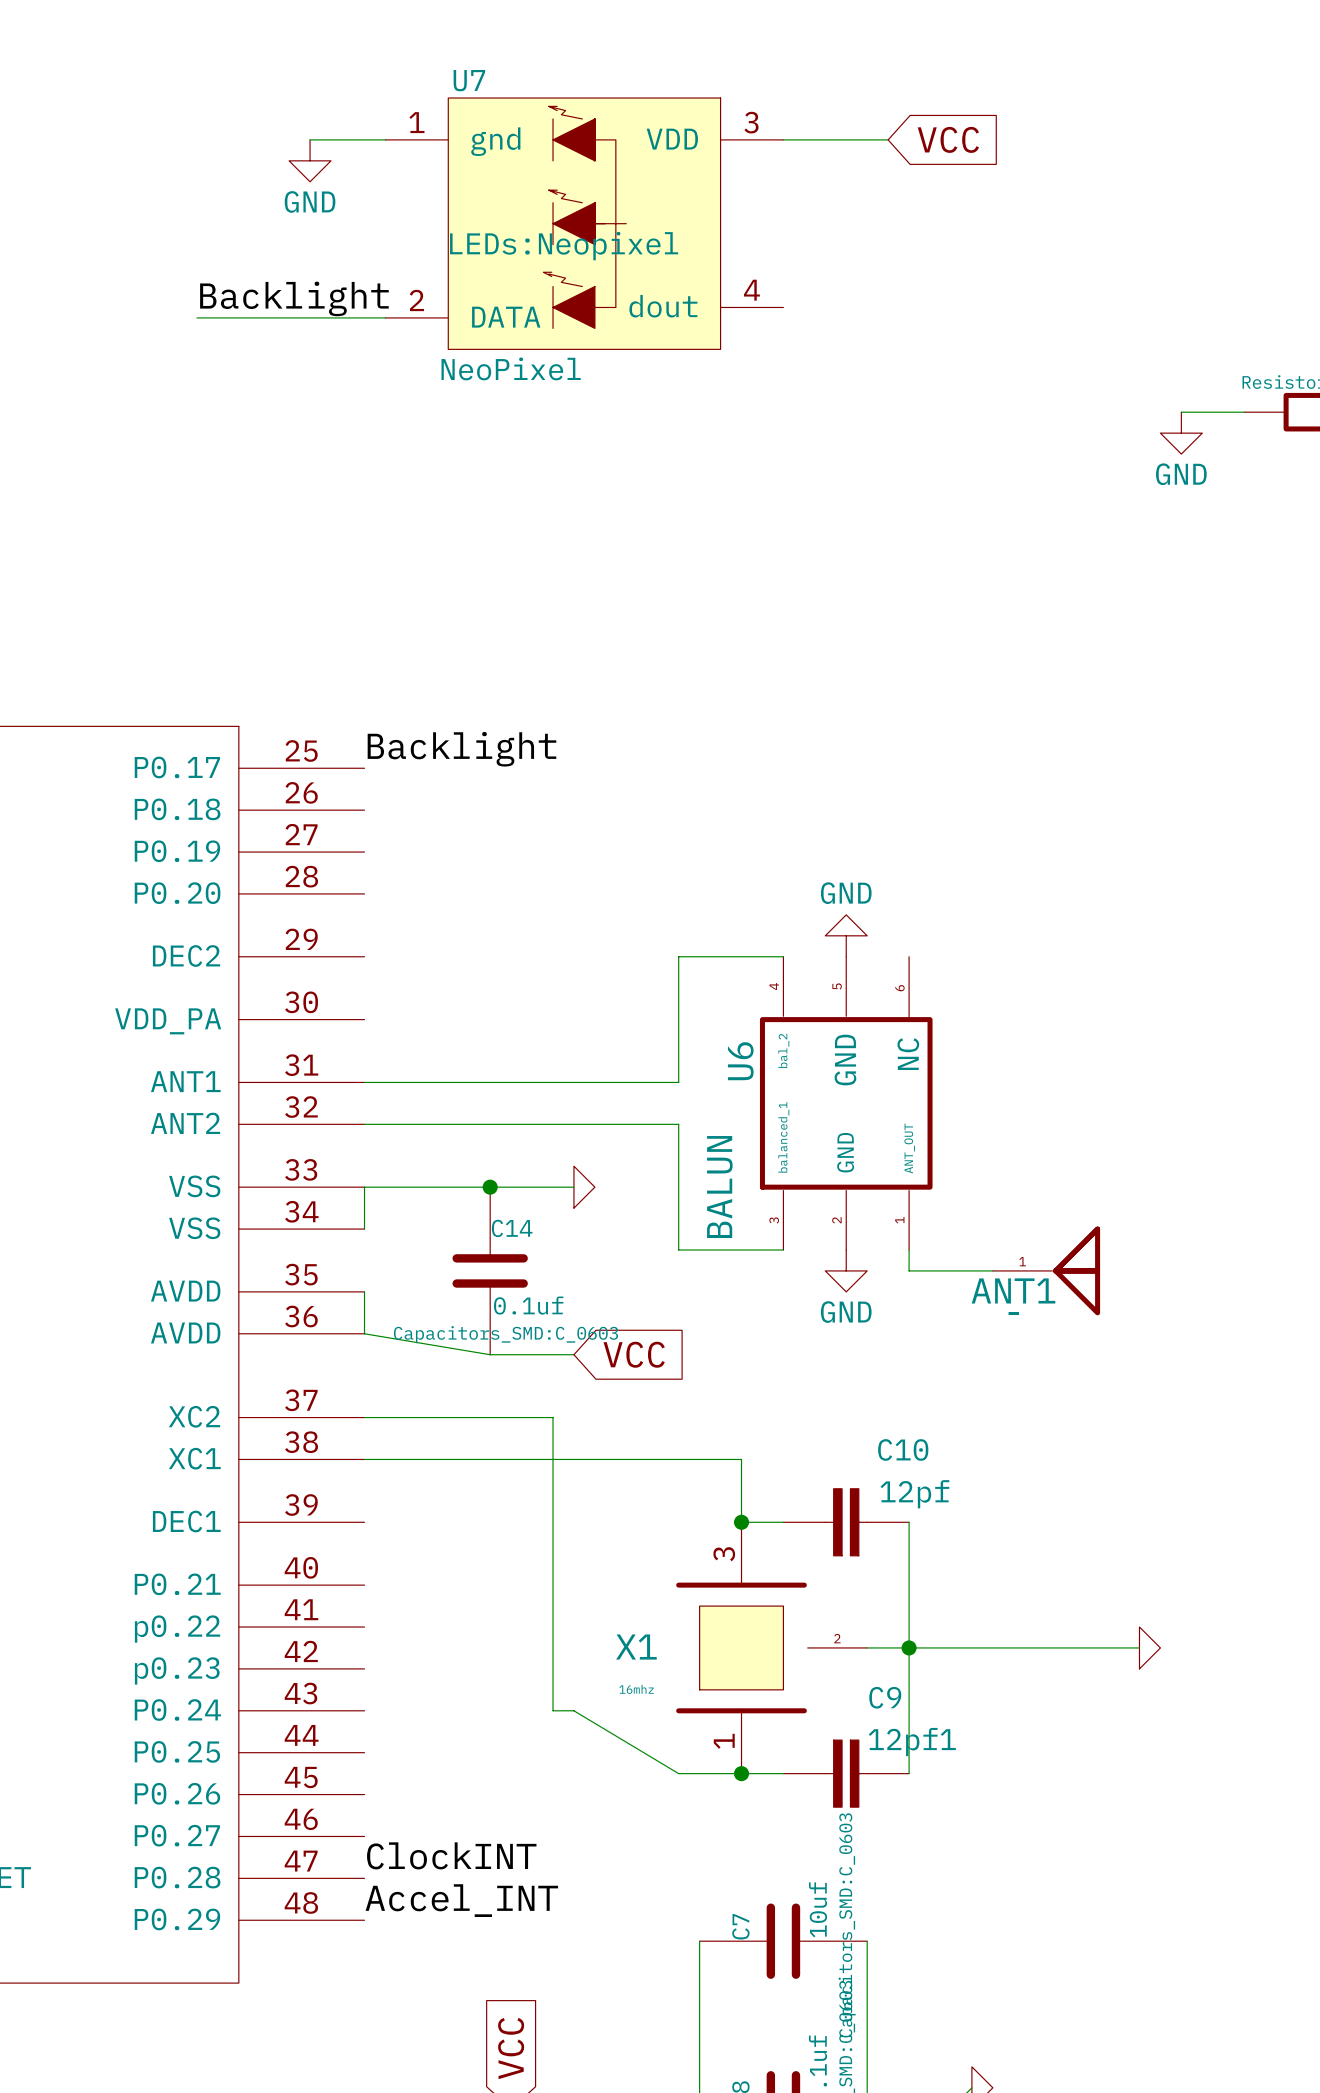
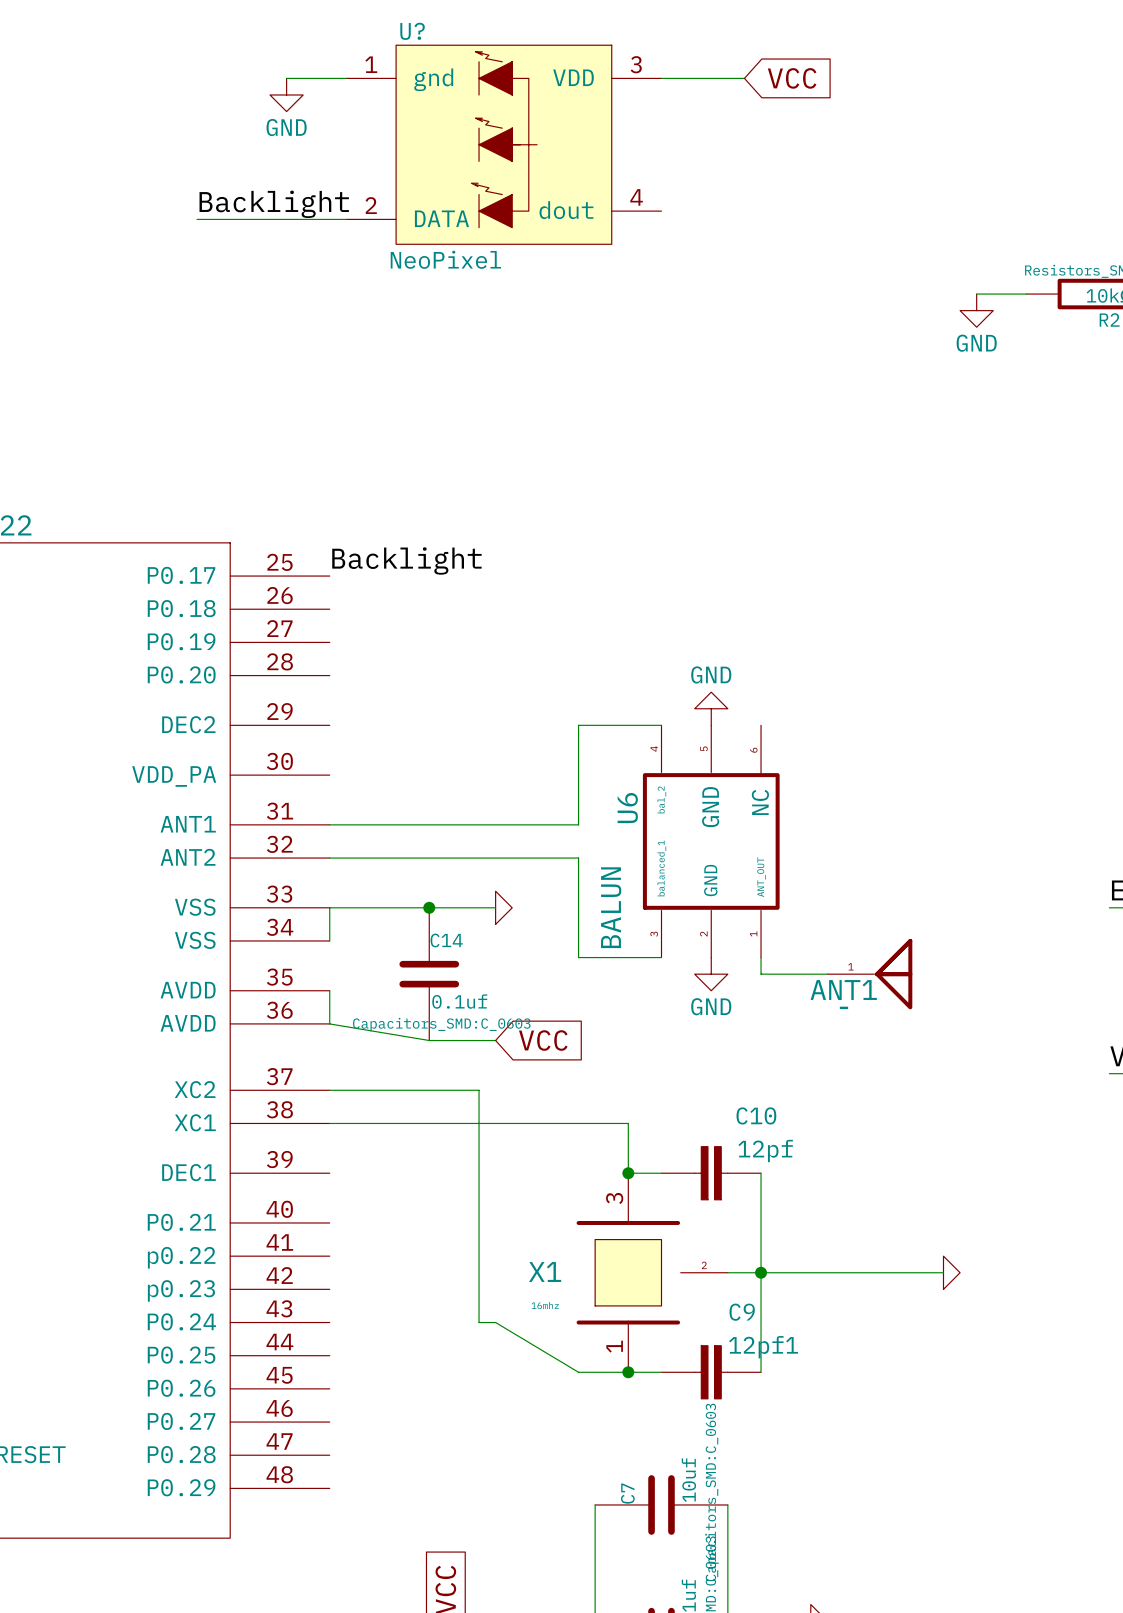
U7 name: U7 (469, 80) -> U? (412, 31)
U7 text: LEDs:Neopixel (564, 246) -> none
label: ClockINT (451, 1855) -> none
label: Accel_INT (461, 1900) -> none

